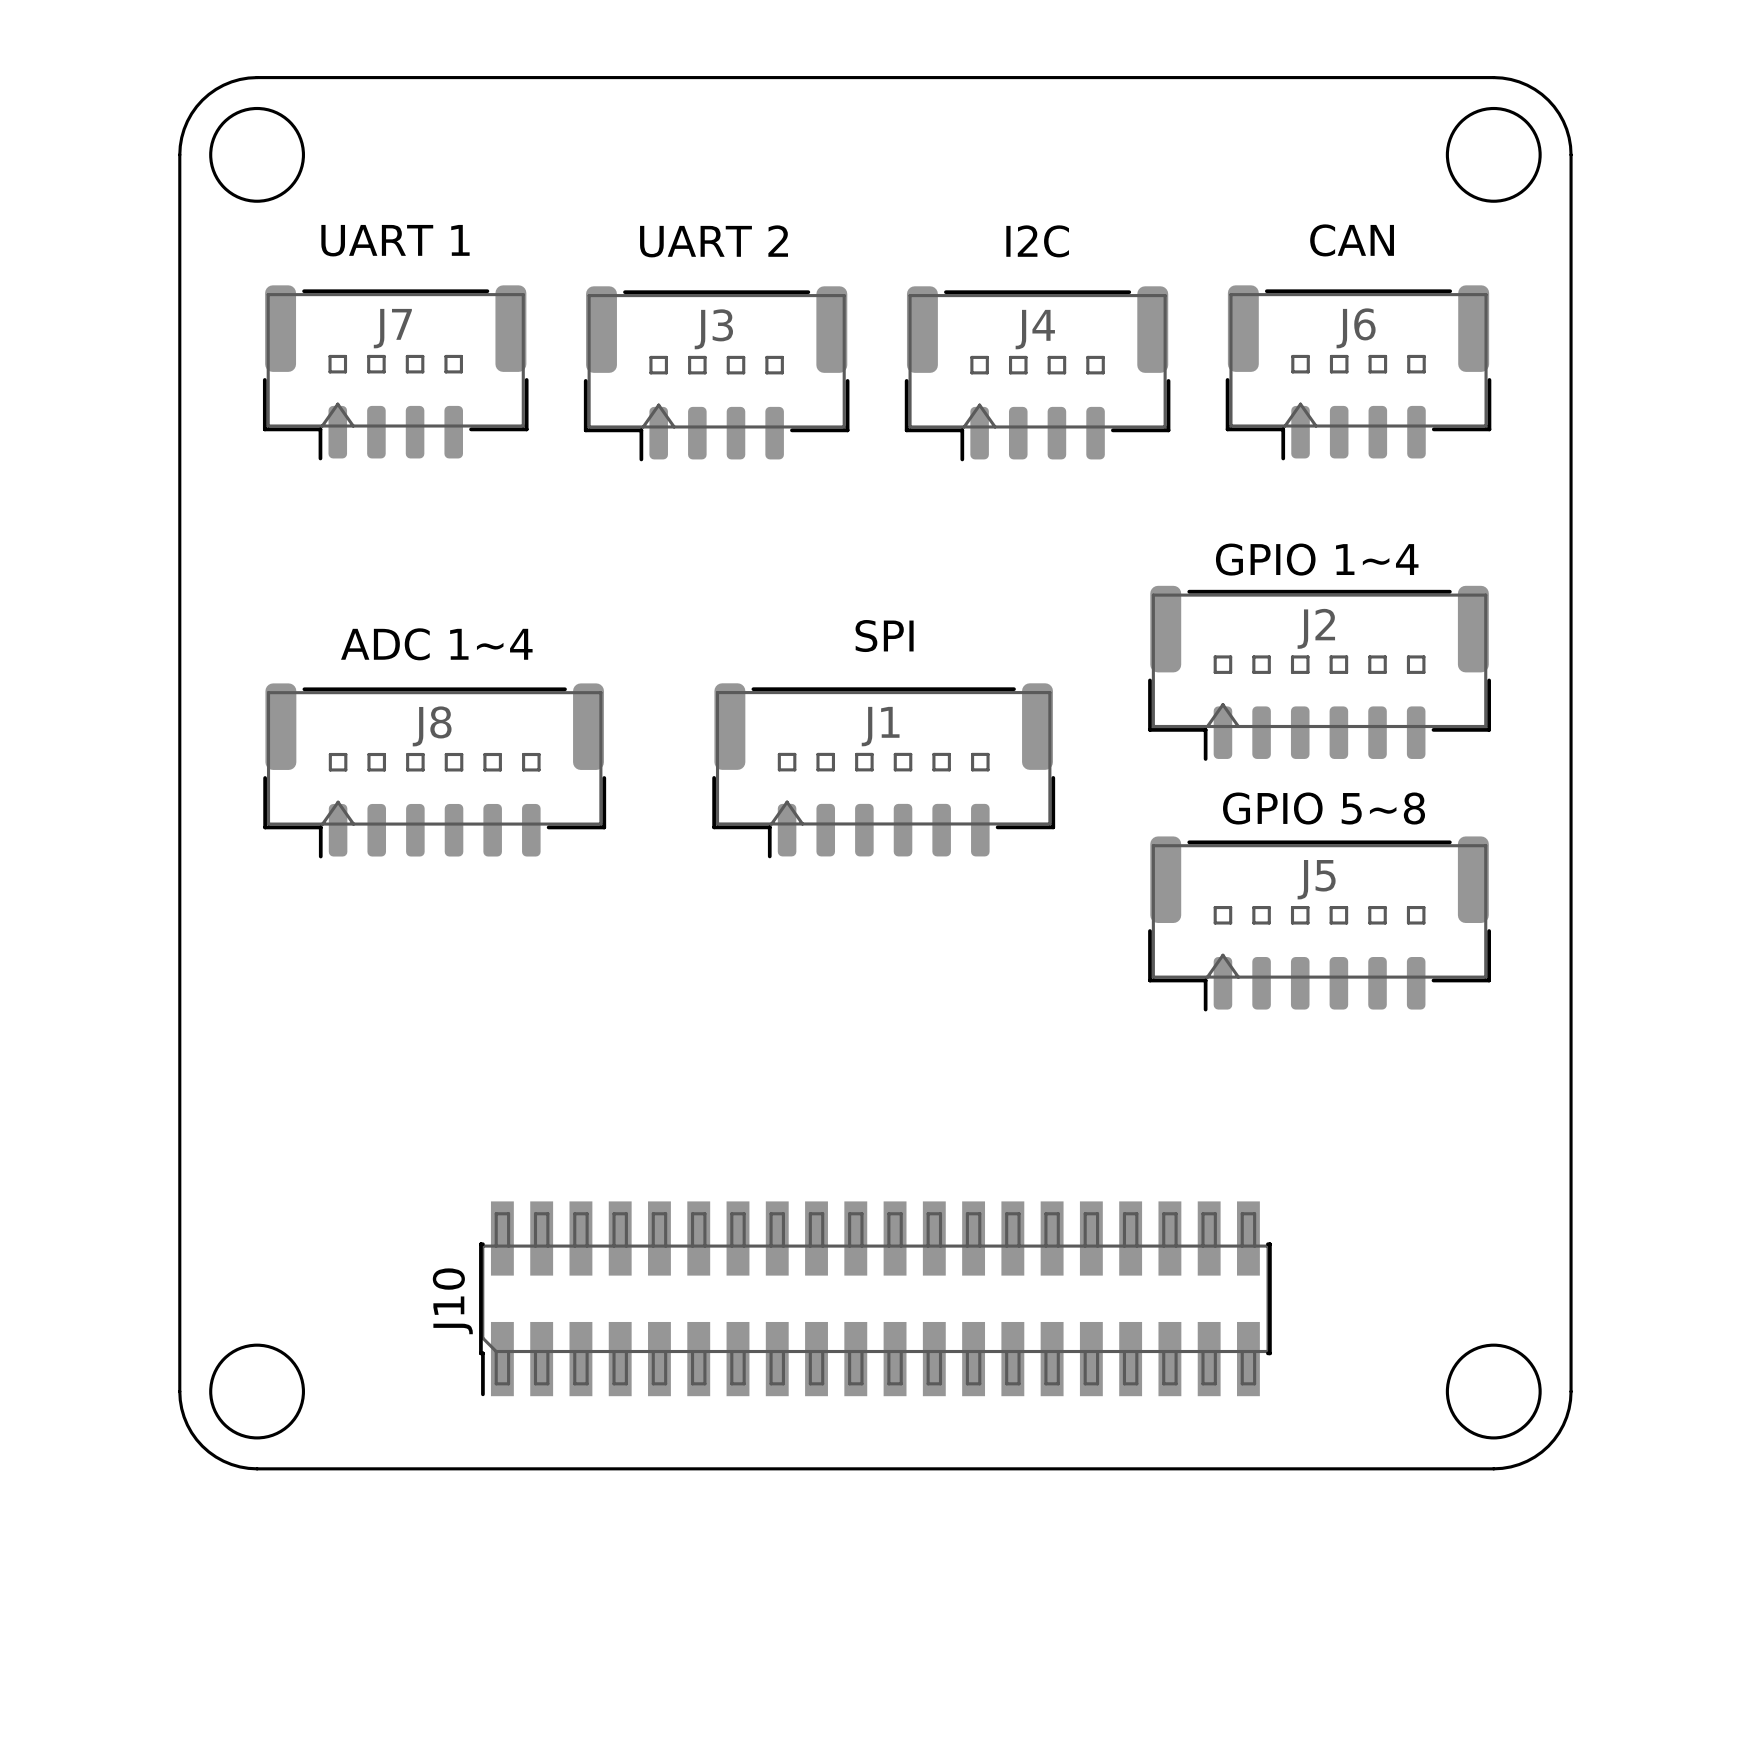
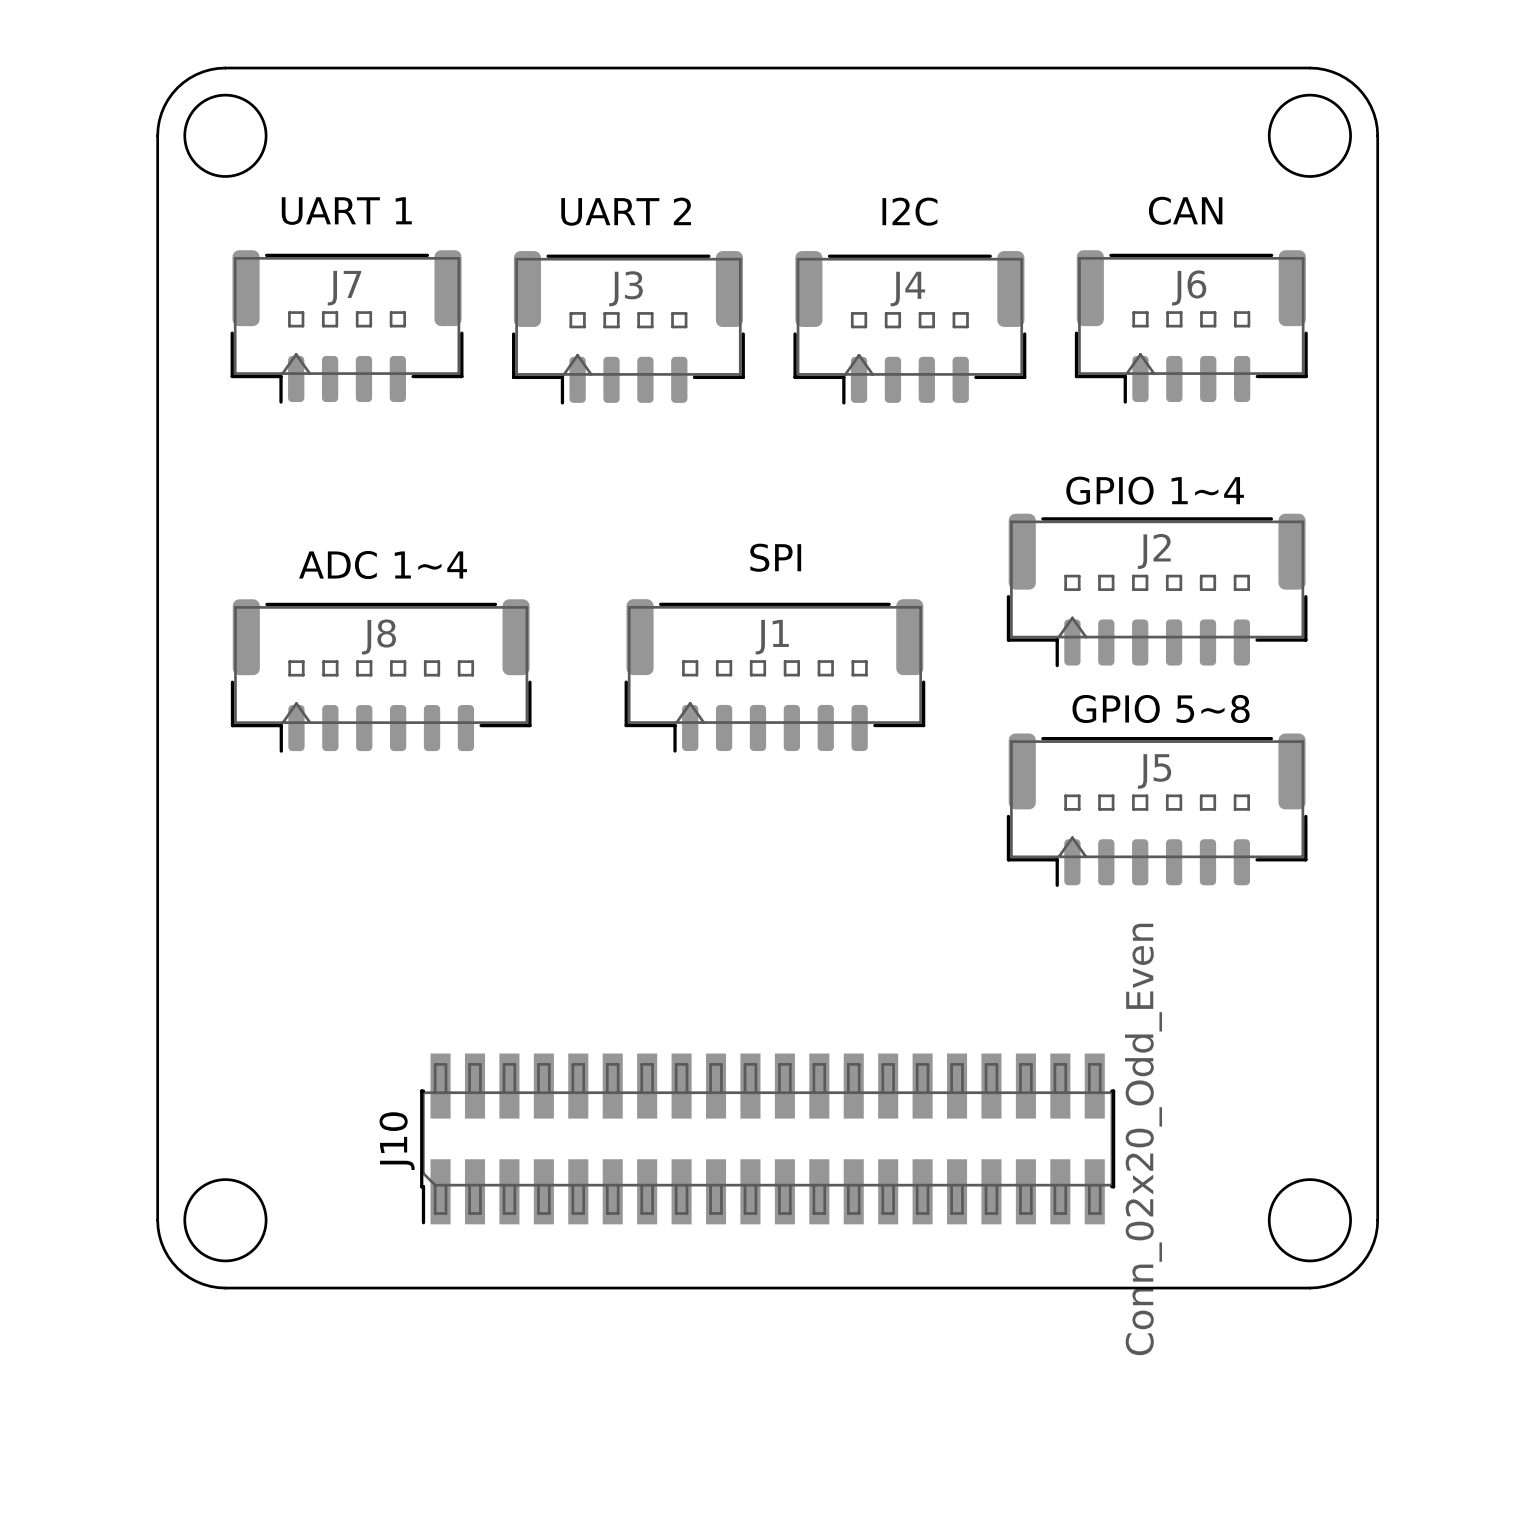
J10 value: none -> Conn_02x20_Odd_Even (1143, 1139)

